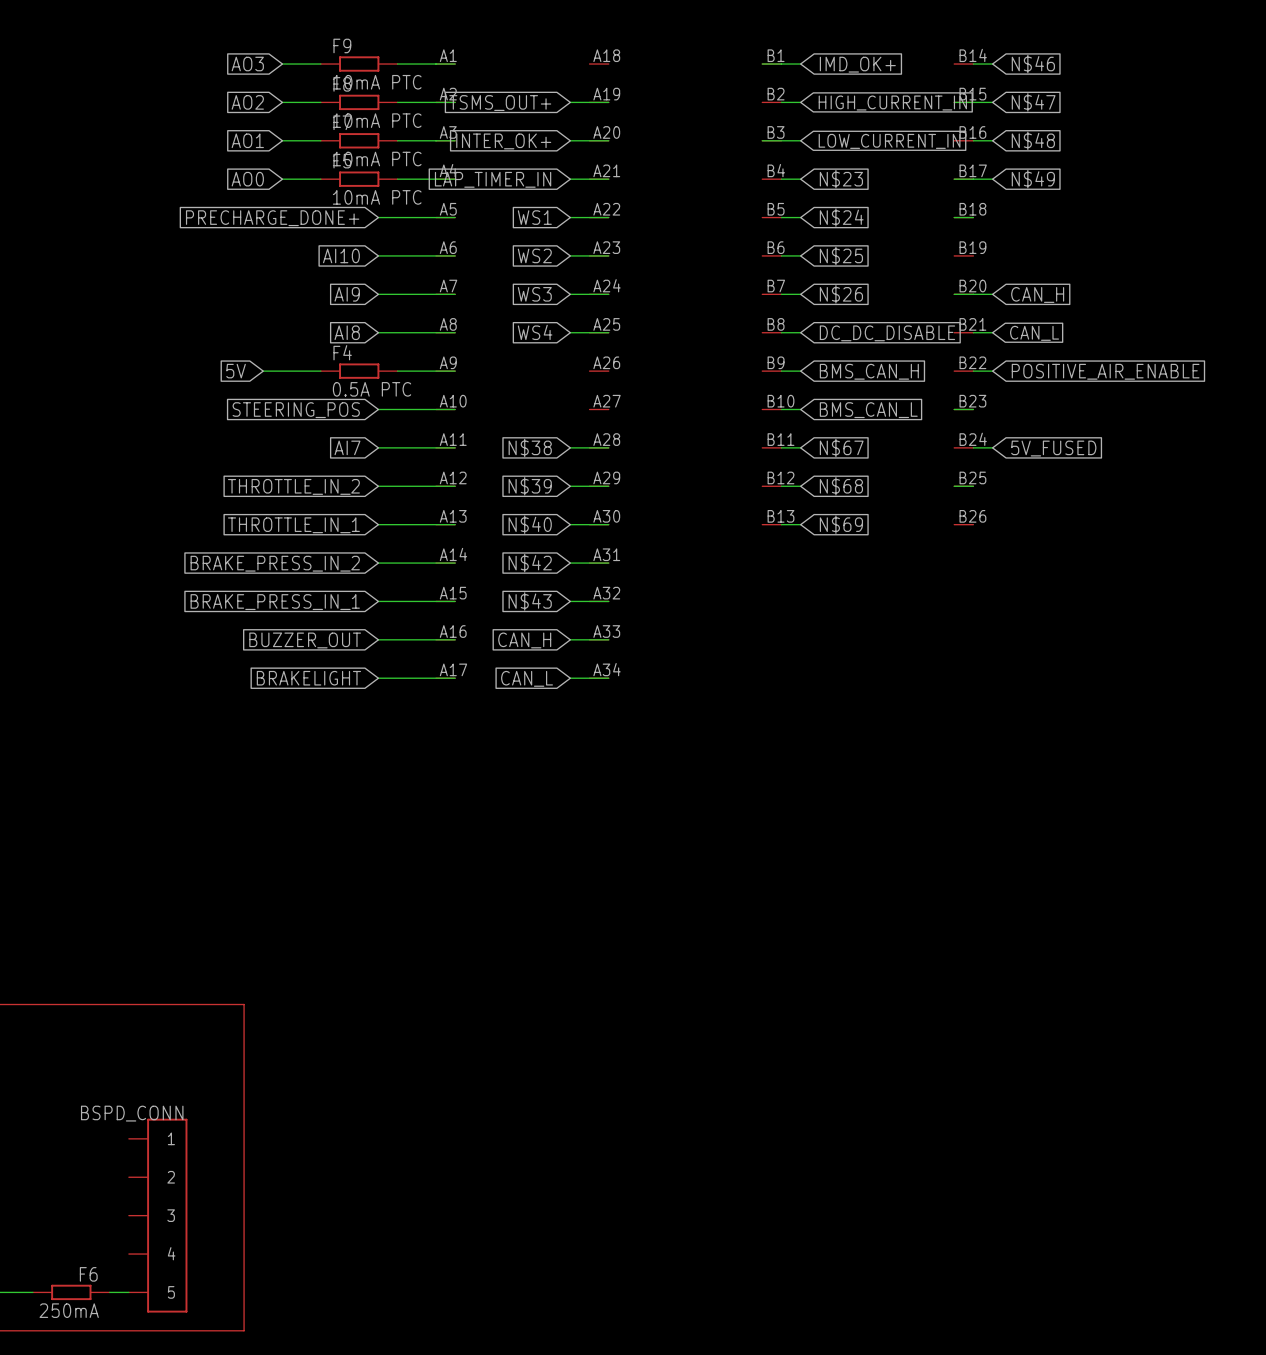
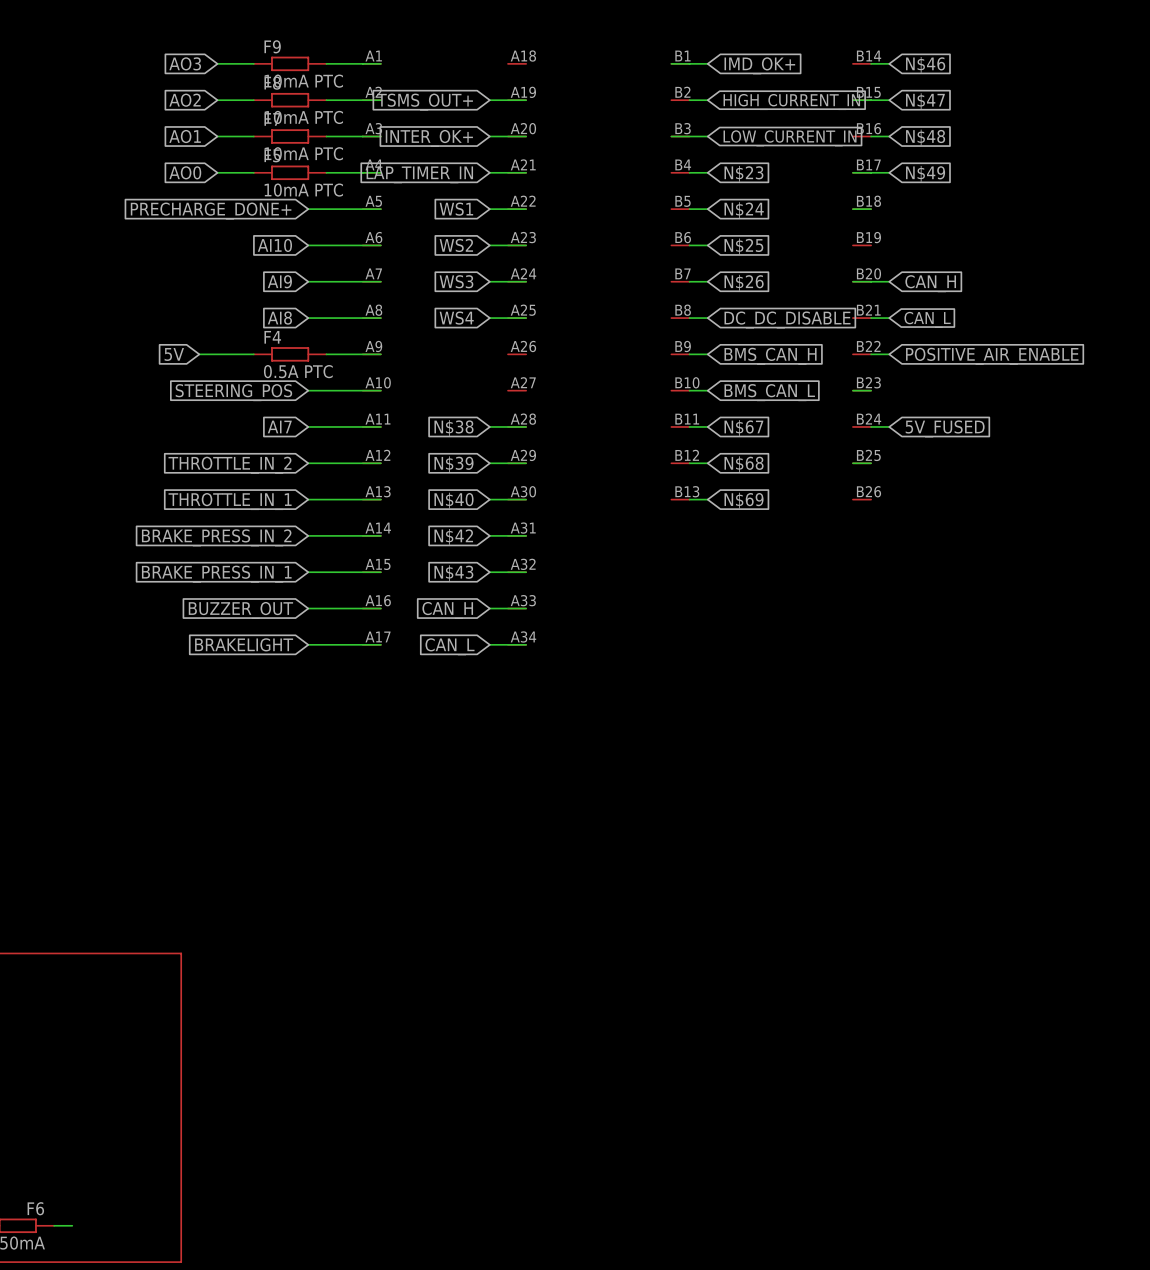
BSPD_CONN: (158, 1215) -> none

